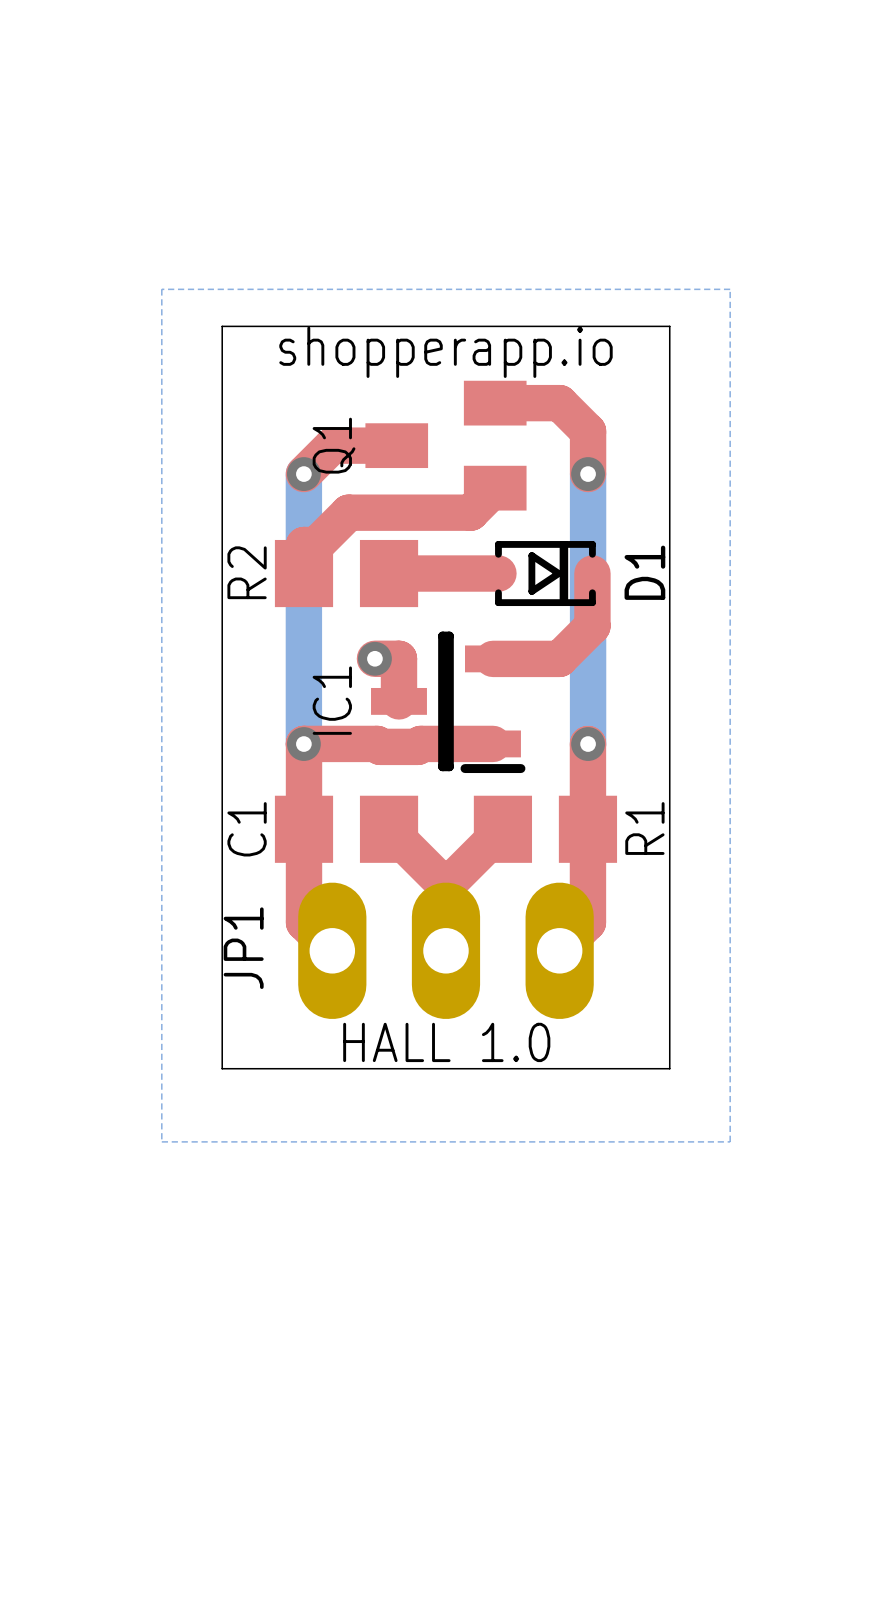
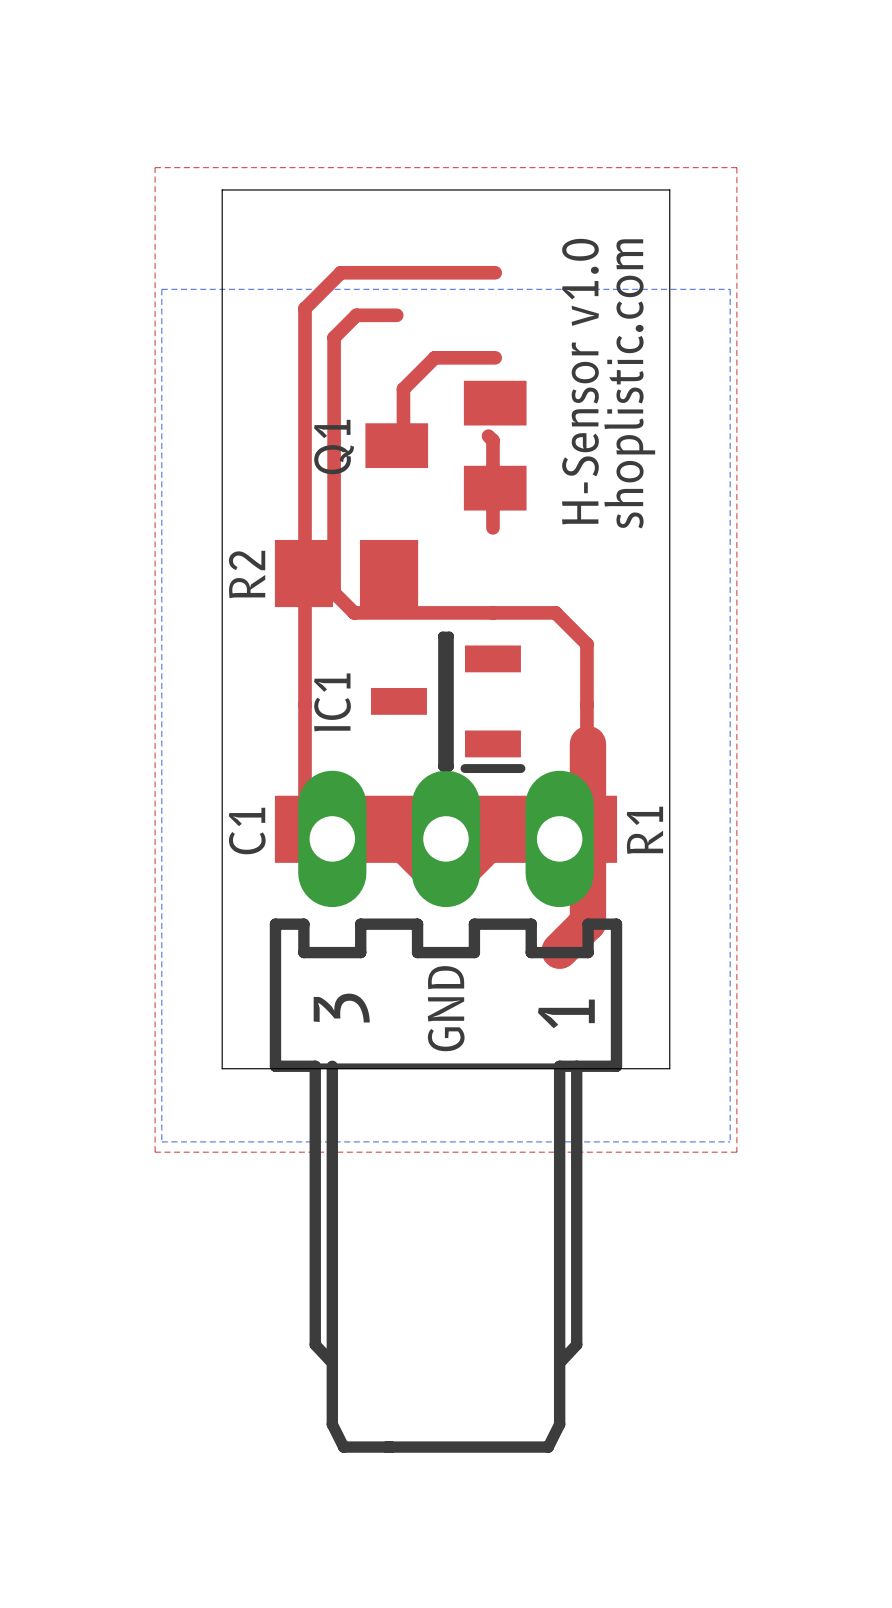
top zone outline: none -> (155, 167) (736, 167) (736, 1152) (155, 1152) (155, 167)
top track: none -> (495, 272) (340, 272) (305, 308) (305, 811) (332, 838)
top track: none -> (396, 315) (356, 315) (334, 337) (334, 592) (354, 612) (555, 612) (586, 644) (586, 811) (559, 838)
board edge: (222, 326) (669, 326) -> (222, 326) (222, 189) (669, 189) (669, 326)
text: shopperapp.io (445, 352) -> none
top track: none -> (495, 357) (434, 357) (403, 389) (403, 436)
top track: (495, 403) (559, 403) (588, 431) (588, 474) -> none
text: none -> shoplistic.com (629, 383)
text: none -> H-Sensor v1.0 (580, 381)
top track: none -> (488, 436) (492, 440) (492, 527)
top track: (396, 445) (332, 445) (303, 474) -> none
bottom track: (303, 474) (303, 744) -> none
via: (303, 474) -> none
bottom track: (588, 474) (588, 744) -> none
via: (588, 474) -> none
top track: (495, 488) (470, 512) (348, 512) (316, 545) (304, 545) (304, 573) -> none
top track: (389, 573) (498, 573) -> none
D1: (545, 573) -> none
top track: (592, 573) (592, 626) (559, 658) (492, 658) -> none
top track: (374, 658) (398, 658) (398, 701) -> none
via: (374, 658) -> none
top track: (492, 743) (420, 743) (417, 746) (380, 746) (377, 743) (304, 743) (304, 922) (332, 950) -> none
via: (303, 744) -> none
via: (588, 744) -> none
JP1: (445, 950) -> none
text: HALL 1.0 (446, 1042) -> GND (446, 1008)
part: none -> (445, 1111)

